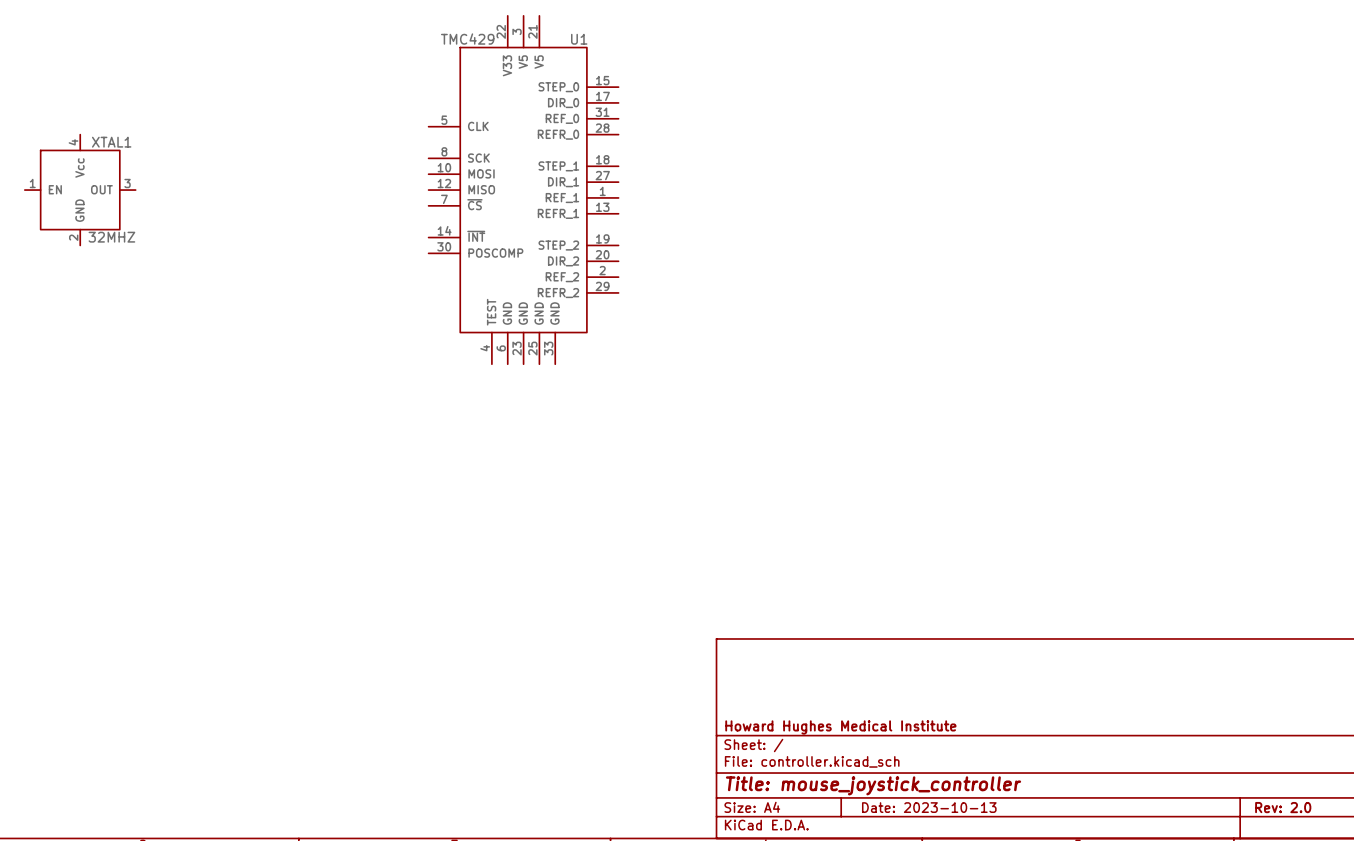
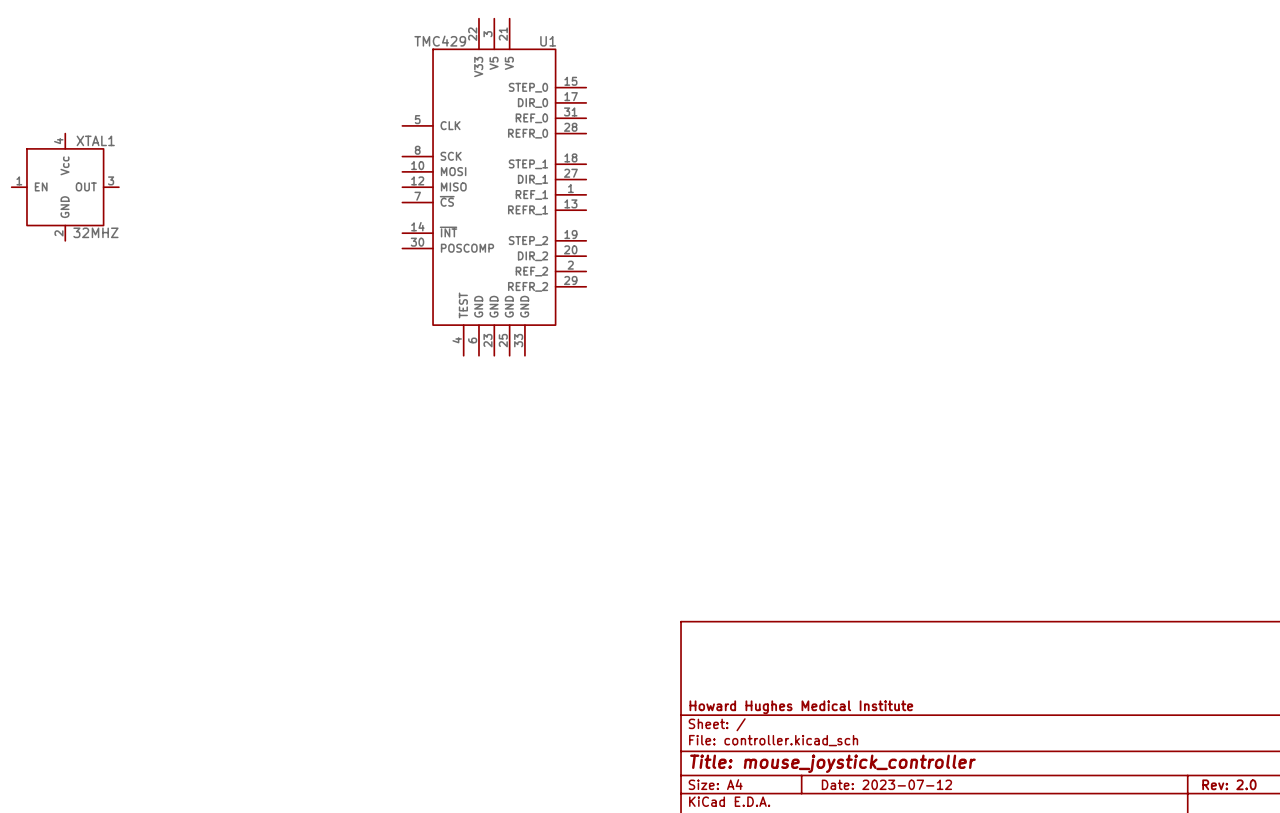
title block: Date: 2023-10-13 (929, 807) -> Date: 2023-07-12 (886, 784)

